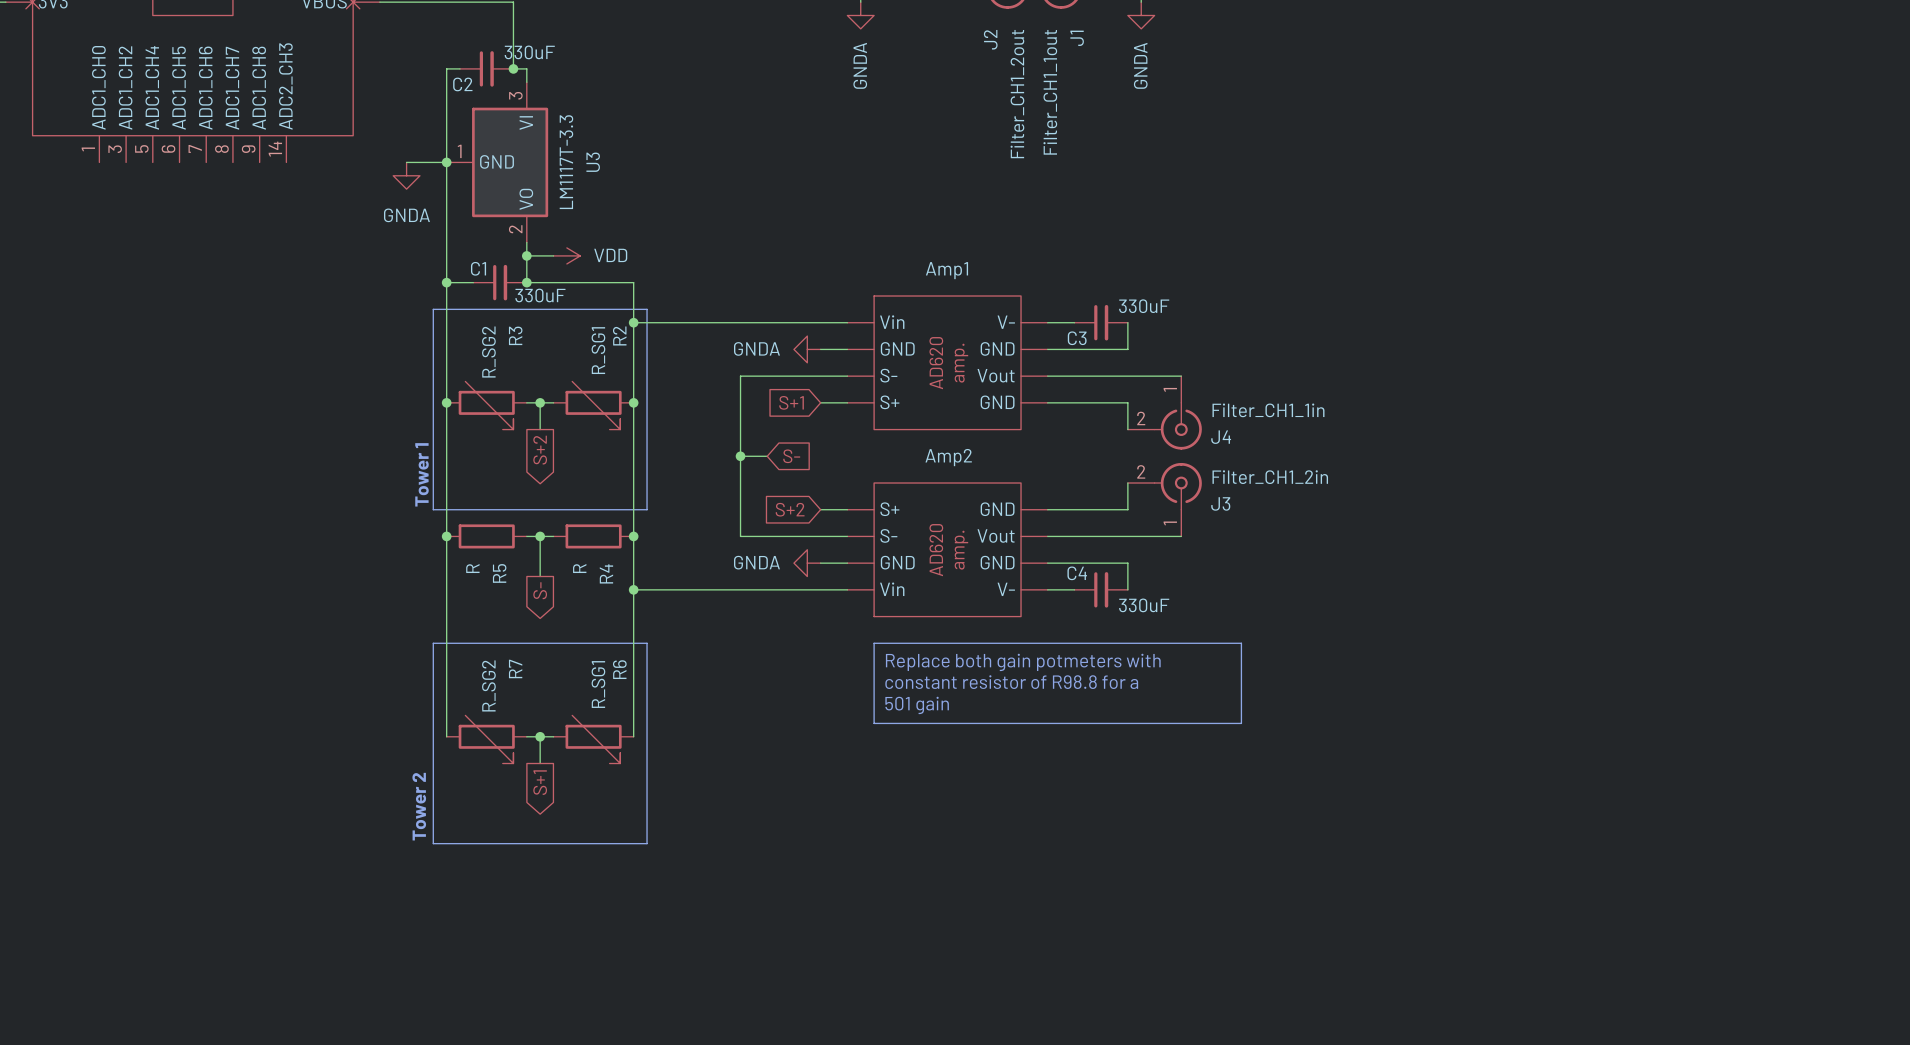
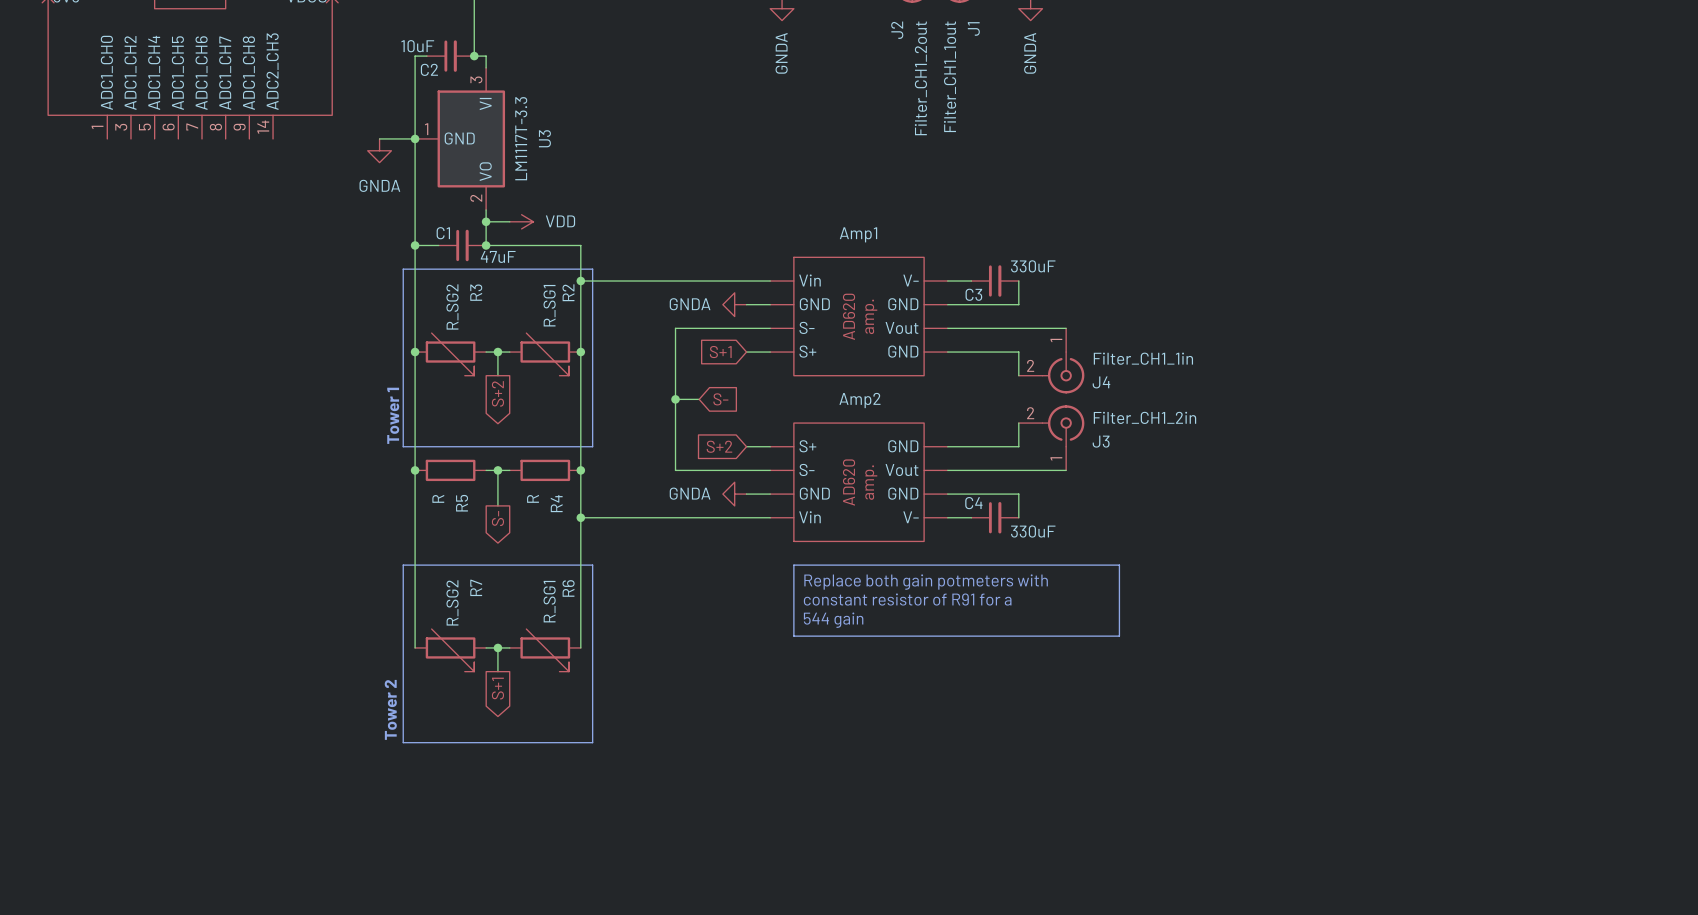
C2 value: 330uF (529, 52) -> 10uF (417, 46)
C1 value: 330uF (540, 295) -> 47uF (498, 256)
text: constant resistor of R98.8 for a (1011, 682) -> constant resistor of R91 for a (907, 599)
text: 501 gain (917, 705) -> 544 gain (833, 620)

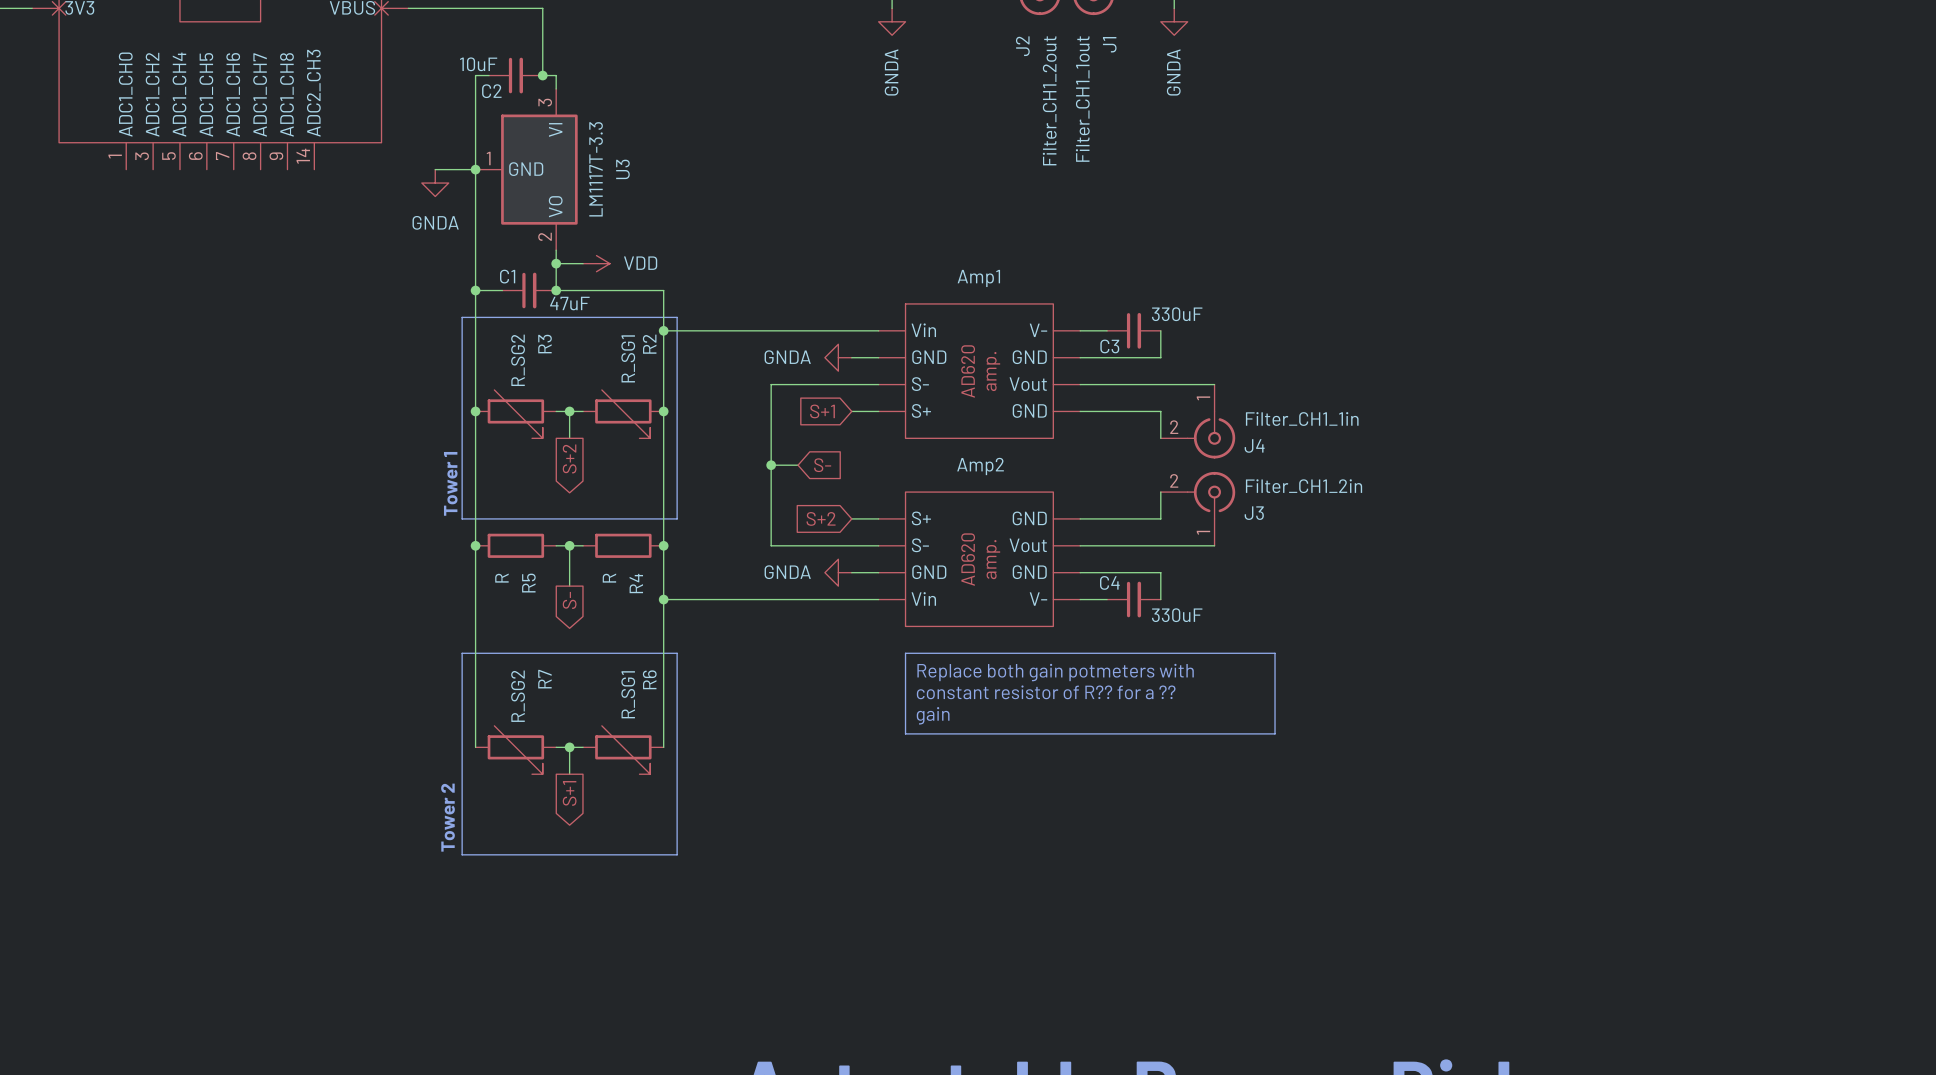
text: constant resistor of R91 for a (907, 599) -> constant resistor of R?? for a ?? (1046, 692)
text: 544 gain (833, 620) -> gain (933, 715)

